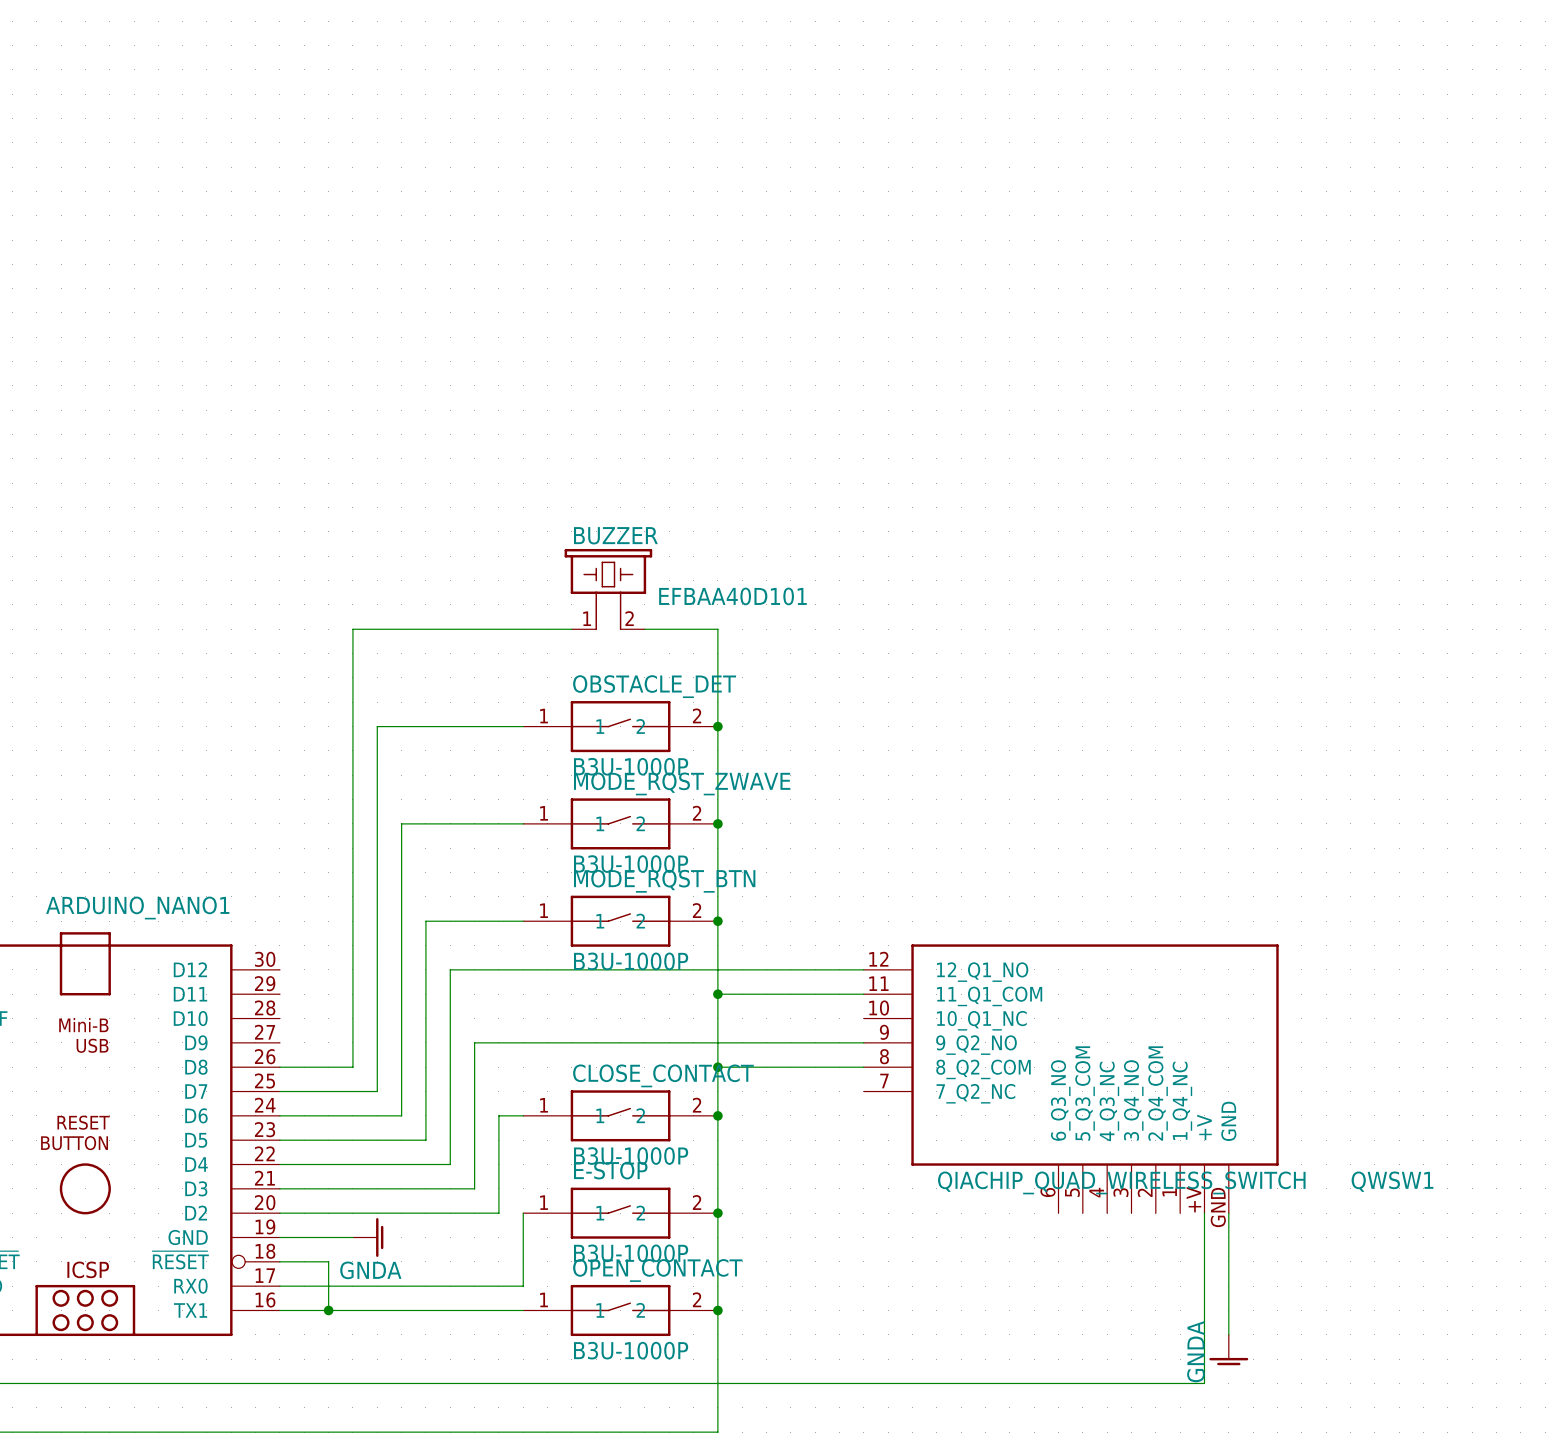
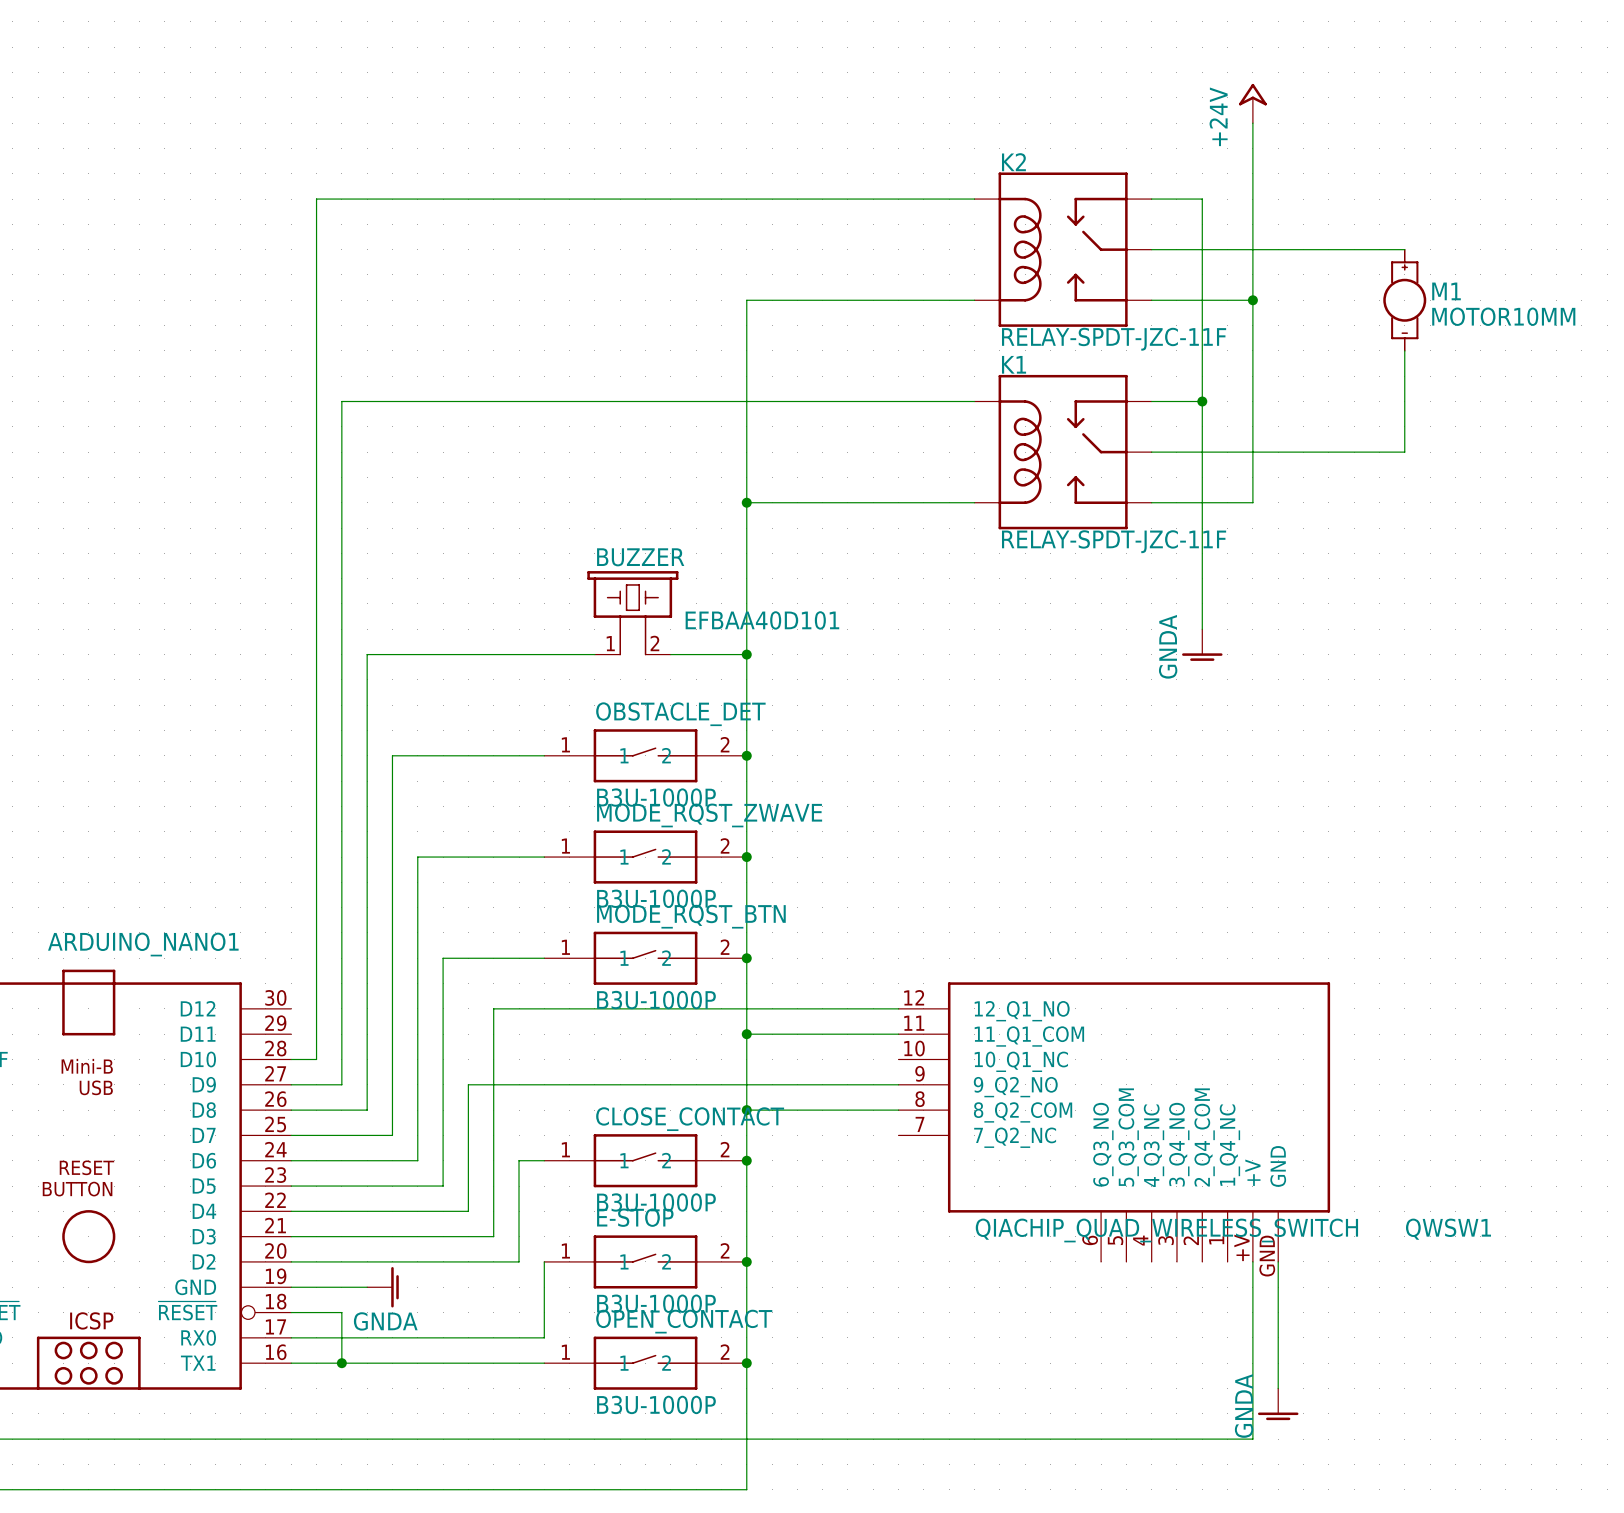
power symbol: none -> +24V (1252, 103)
wire: none -> (1252, 123) (1252, 502) (1151, 502)
wire: none -> (974, 199) (316, 199) (316, 1059) (291, 1059)
wire: none -> (1151, 199) (1202, 199) (1202, 629)
K2: none -> RELAY-SPDT-JZC-11F (1063, 249)
wire: none -> (1151, 249) (1404, 249)
wire: none -> (974, 300) (746, 300) (746, 654)
wire: none -> (1151, 300) (1252, 300)
junction: none -> (1252, 300)
M1: none -> MOTOR10MM (1404, 300)
wire: none -> (1404, 350) (1404, 452) (1151, 452)
wire: none -> (974, 401) (341, 401) (341, 1084) (291, 1084)
wire: none -> (1151, 401) (1202, 401)
junction: none -> (1202, 401)
K1: none -> RELAY-SPDT-JZC-11F (1063, 452)
wire: none -> (746, 502) (974, 502)
junction: none -> (746, 502)
power symbol: none -> GNDA (1202, 645)
junction: none -> (746, 654)
wire: (474, 969) (450, 969) (450, 1042) -> (493, 1008) (493, 1084) (468, 1084)

